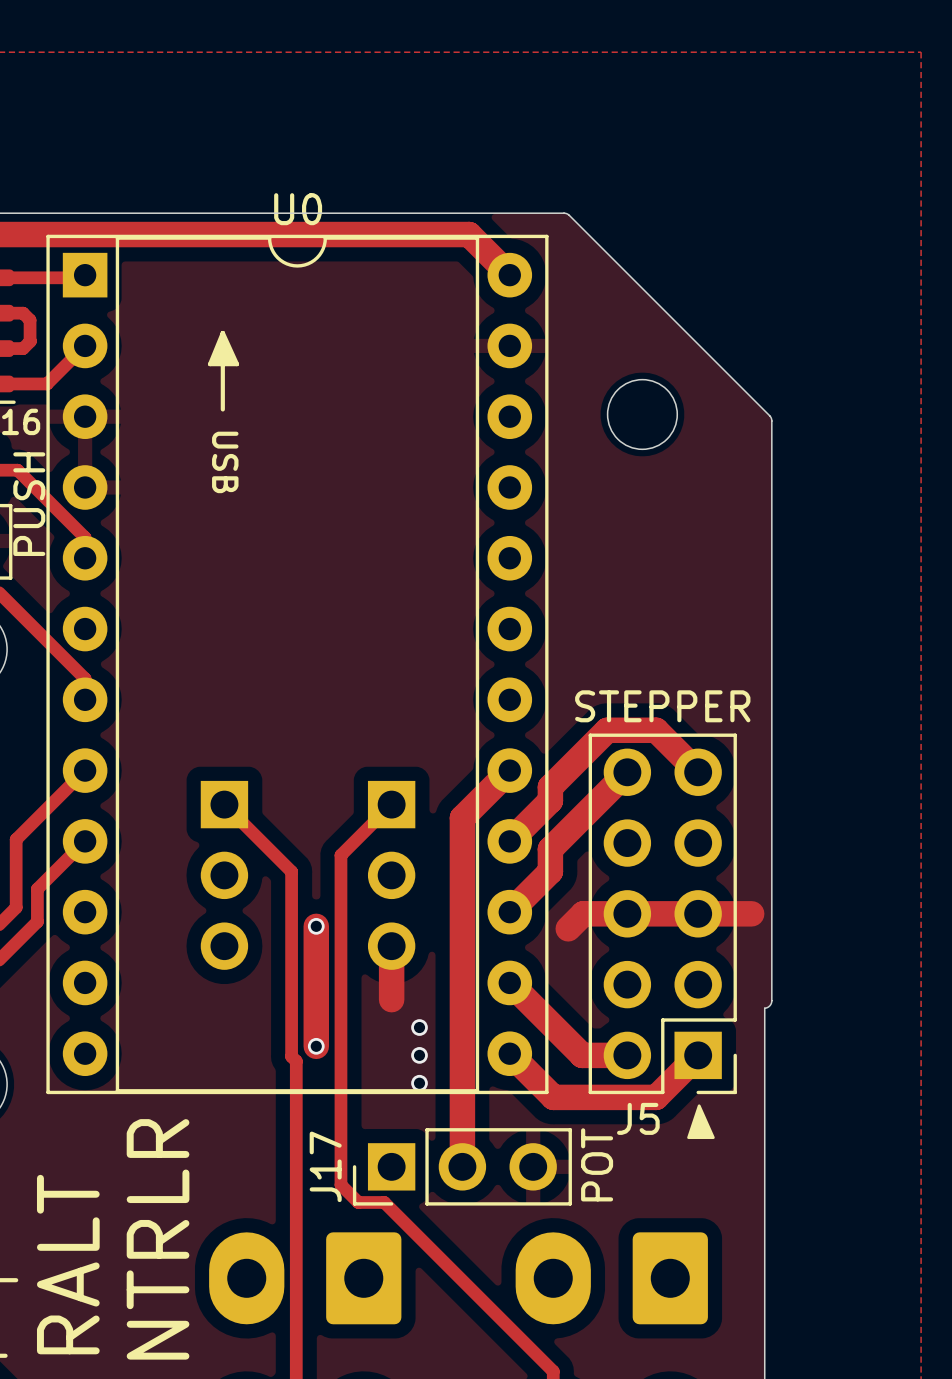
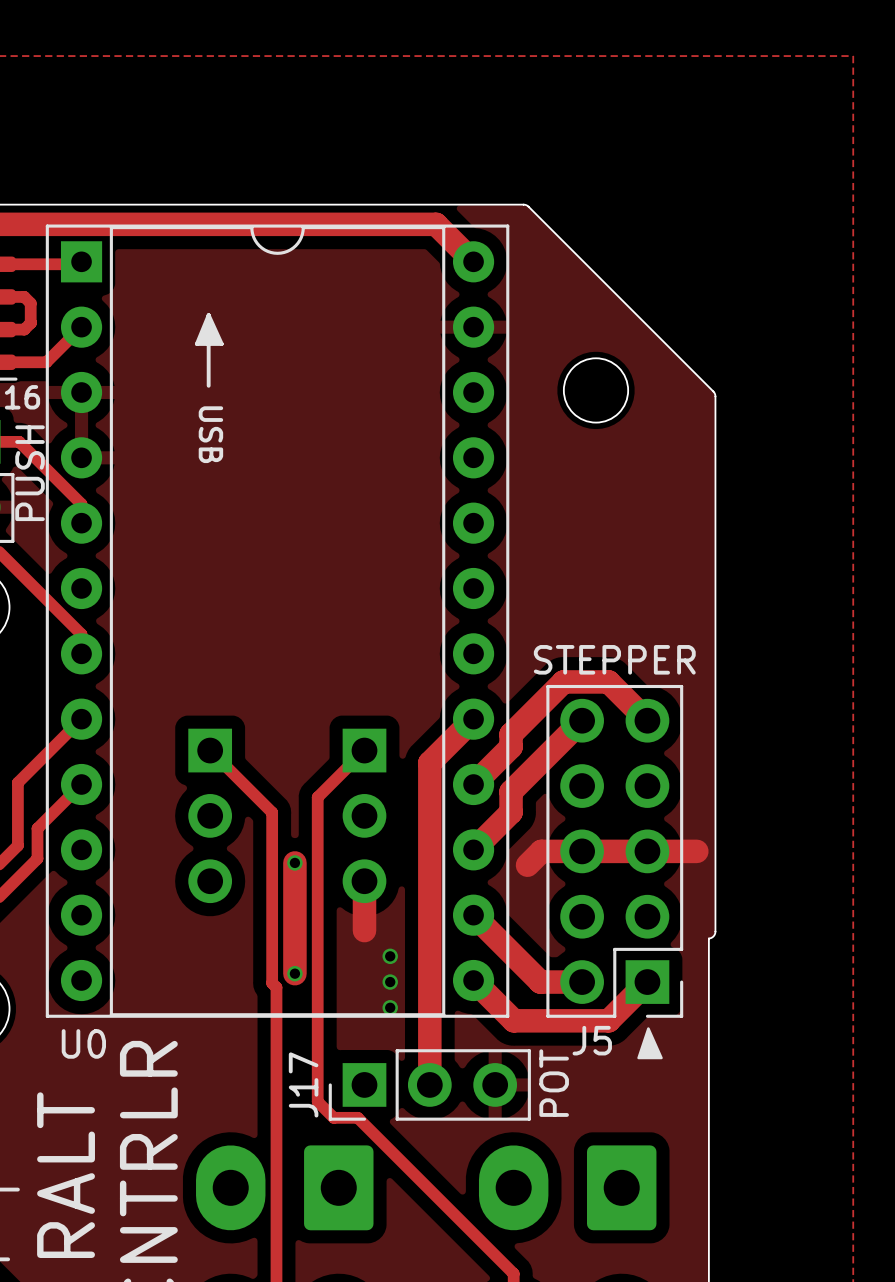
U0 name position: U0 (298, 209) -> U0 (83, 1043)

